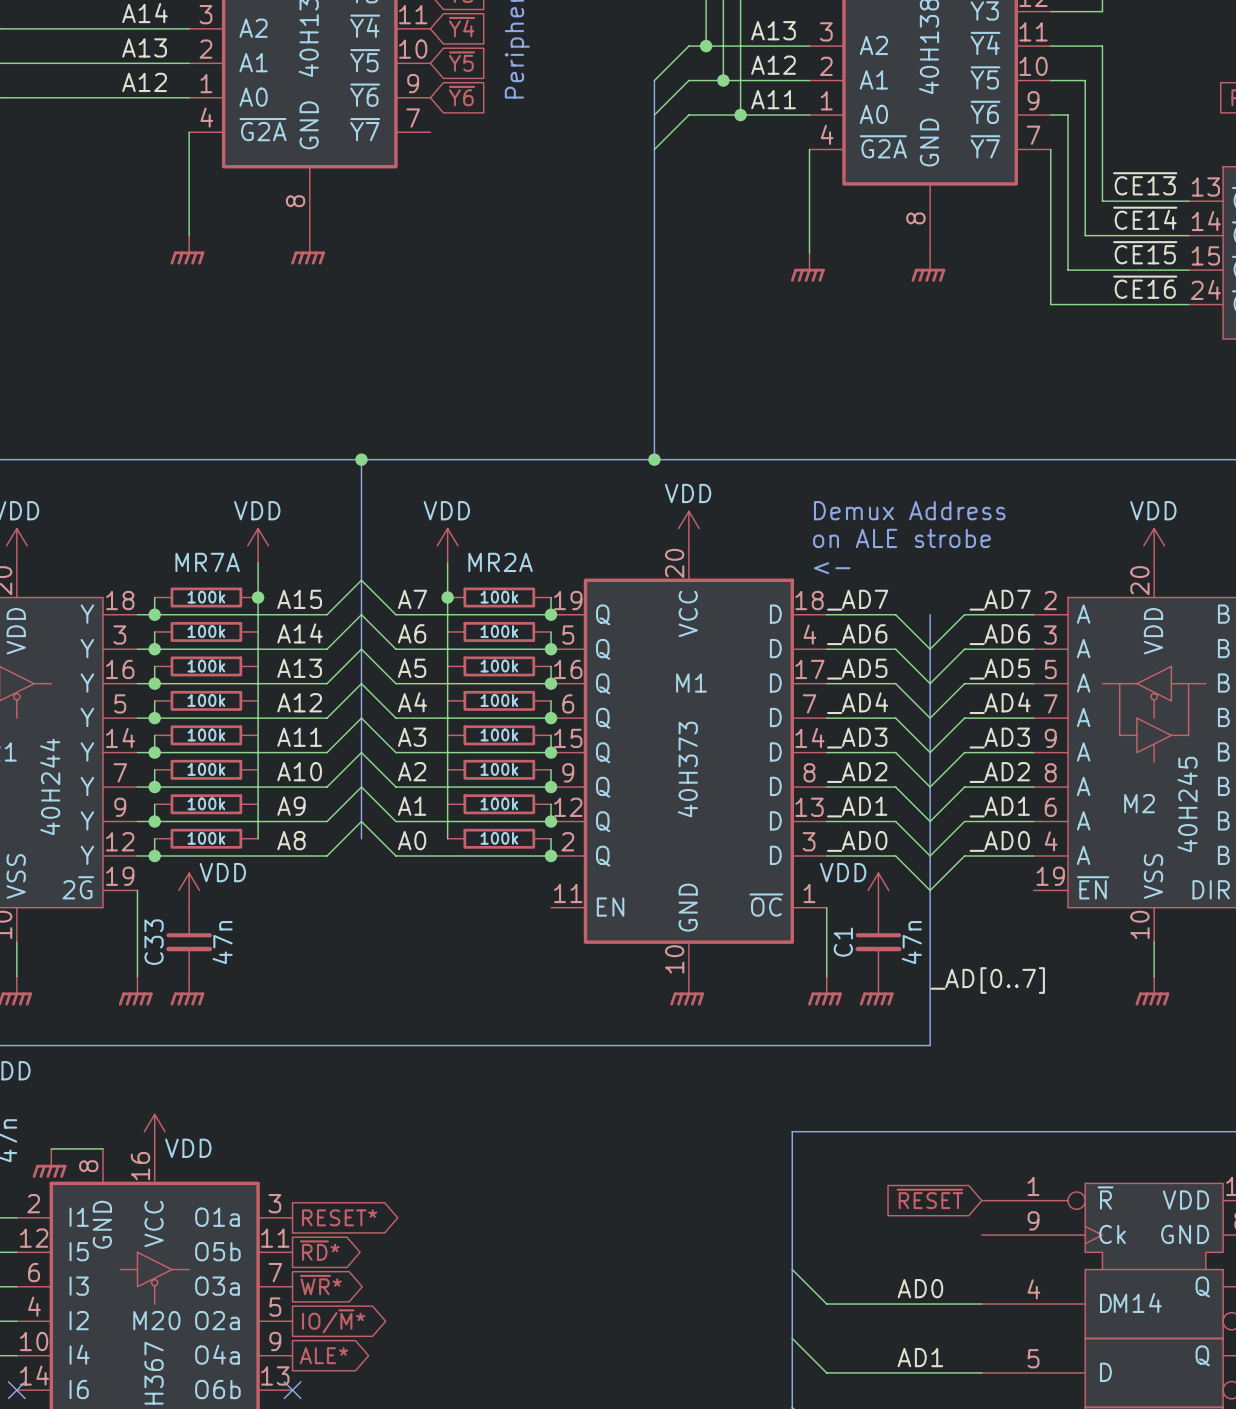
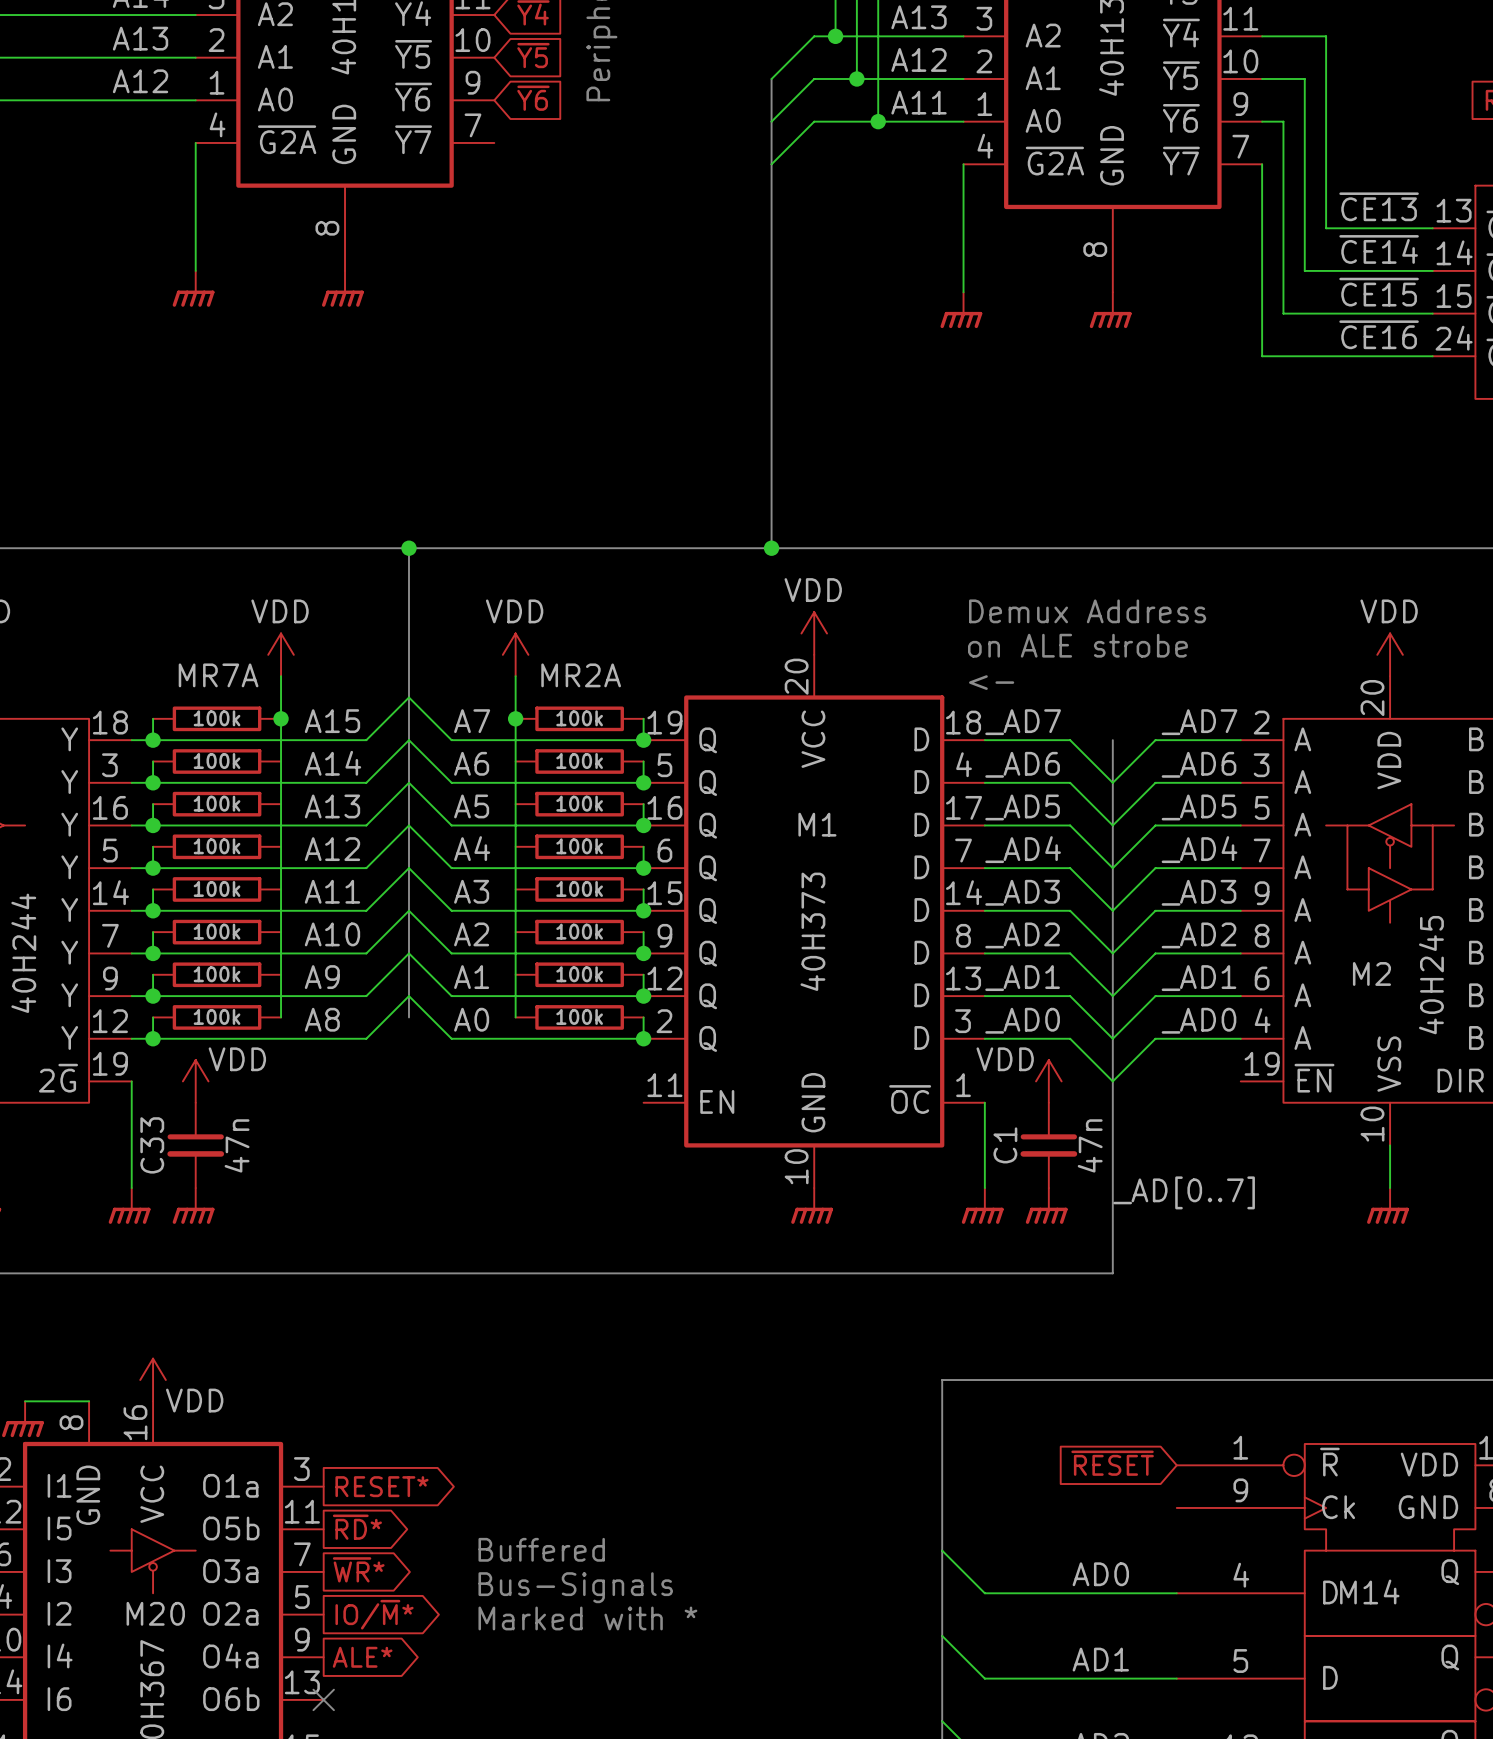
text: none -> Buffered (541, 1549)
text: none -> Bus-Signals (575, 1587)
text: none -> Marked with * (587, 1618)

